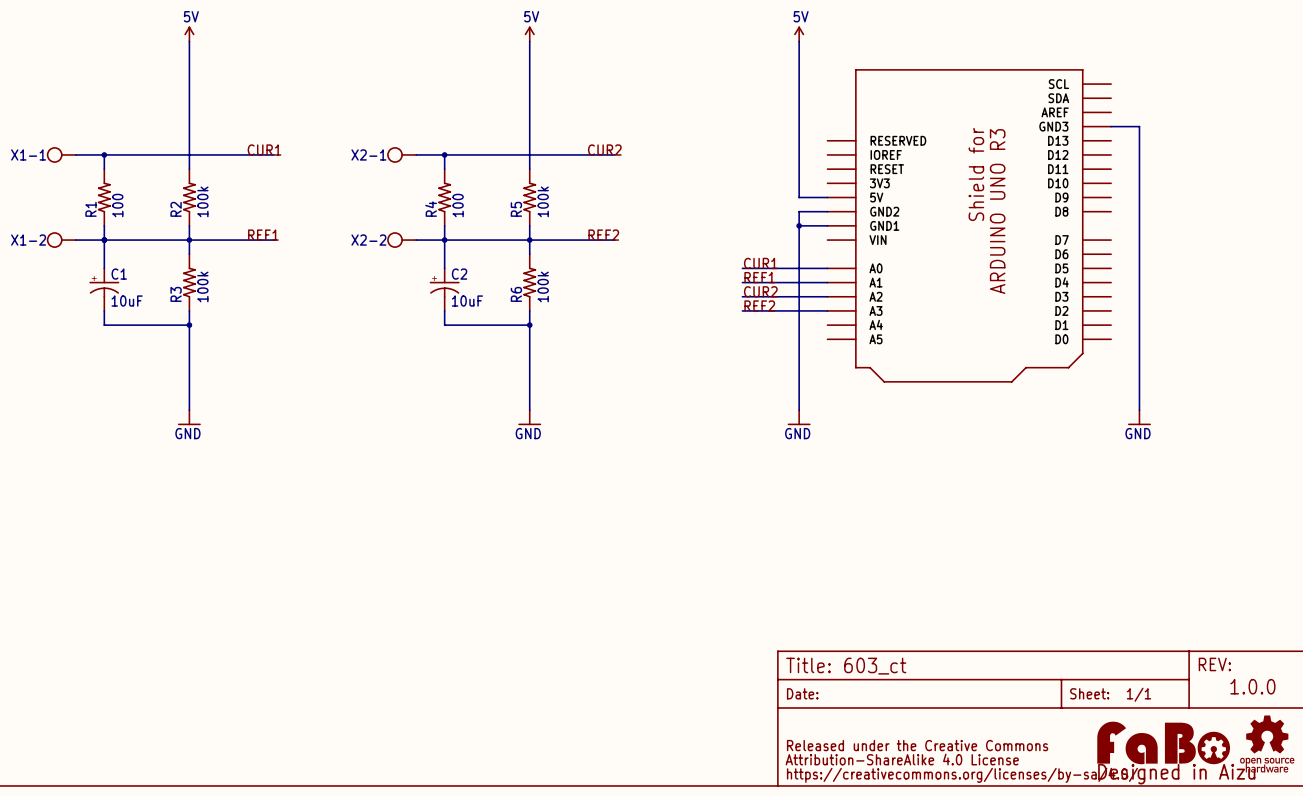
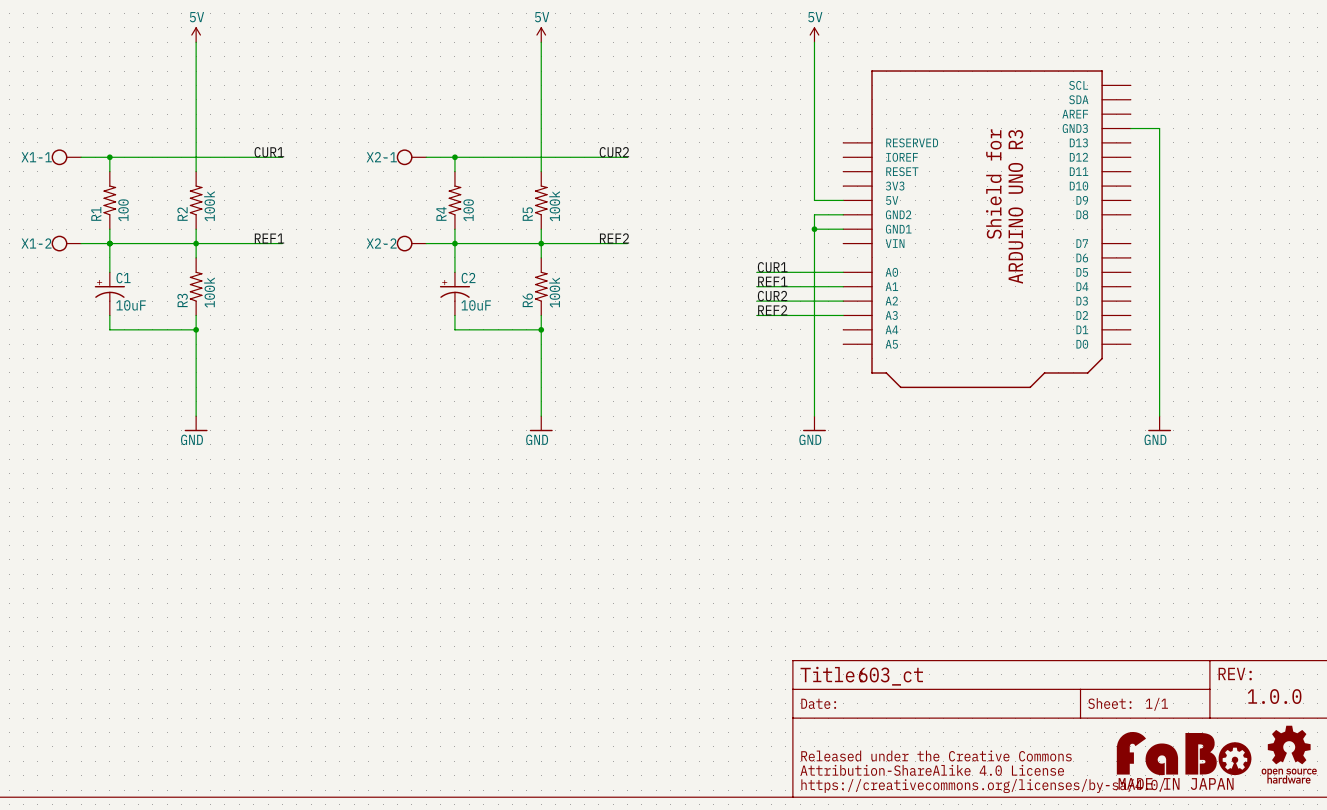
part text: none -> MADE IN JAPAN (1176, 784)
part text: Designed in Aizu (1176, 774) -> none

